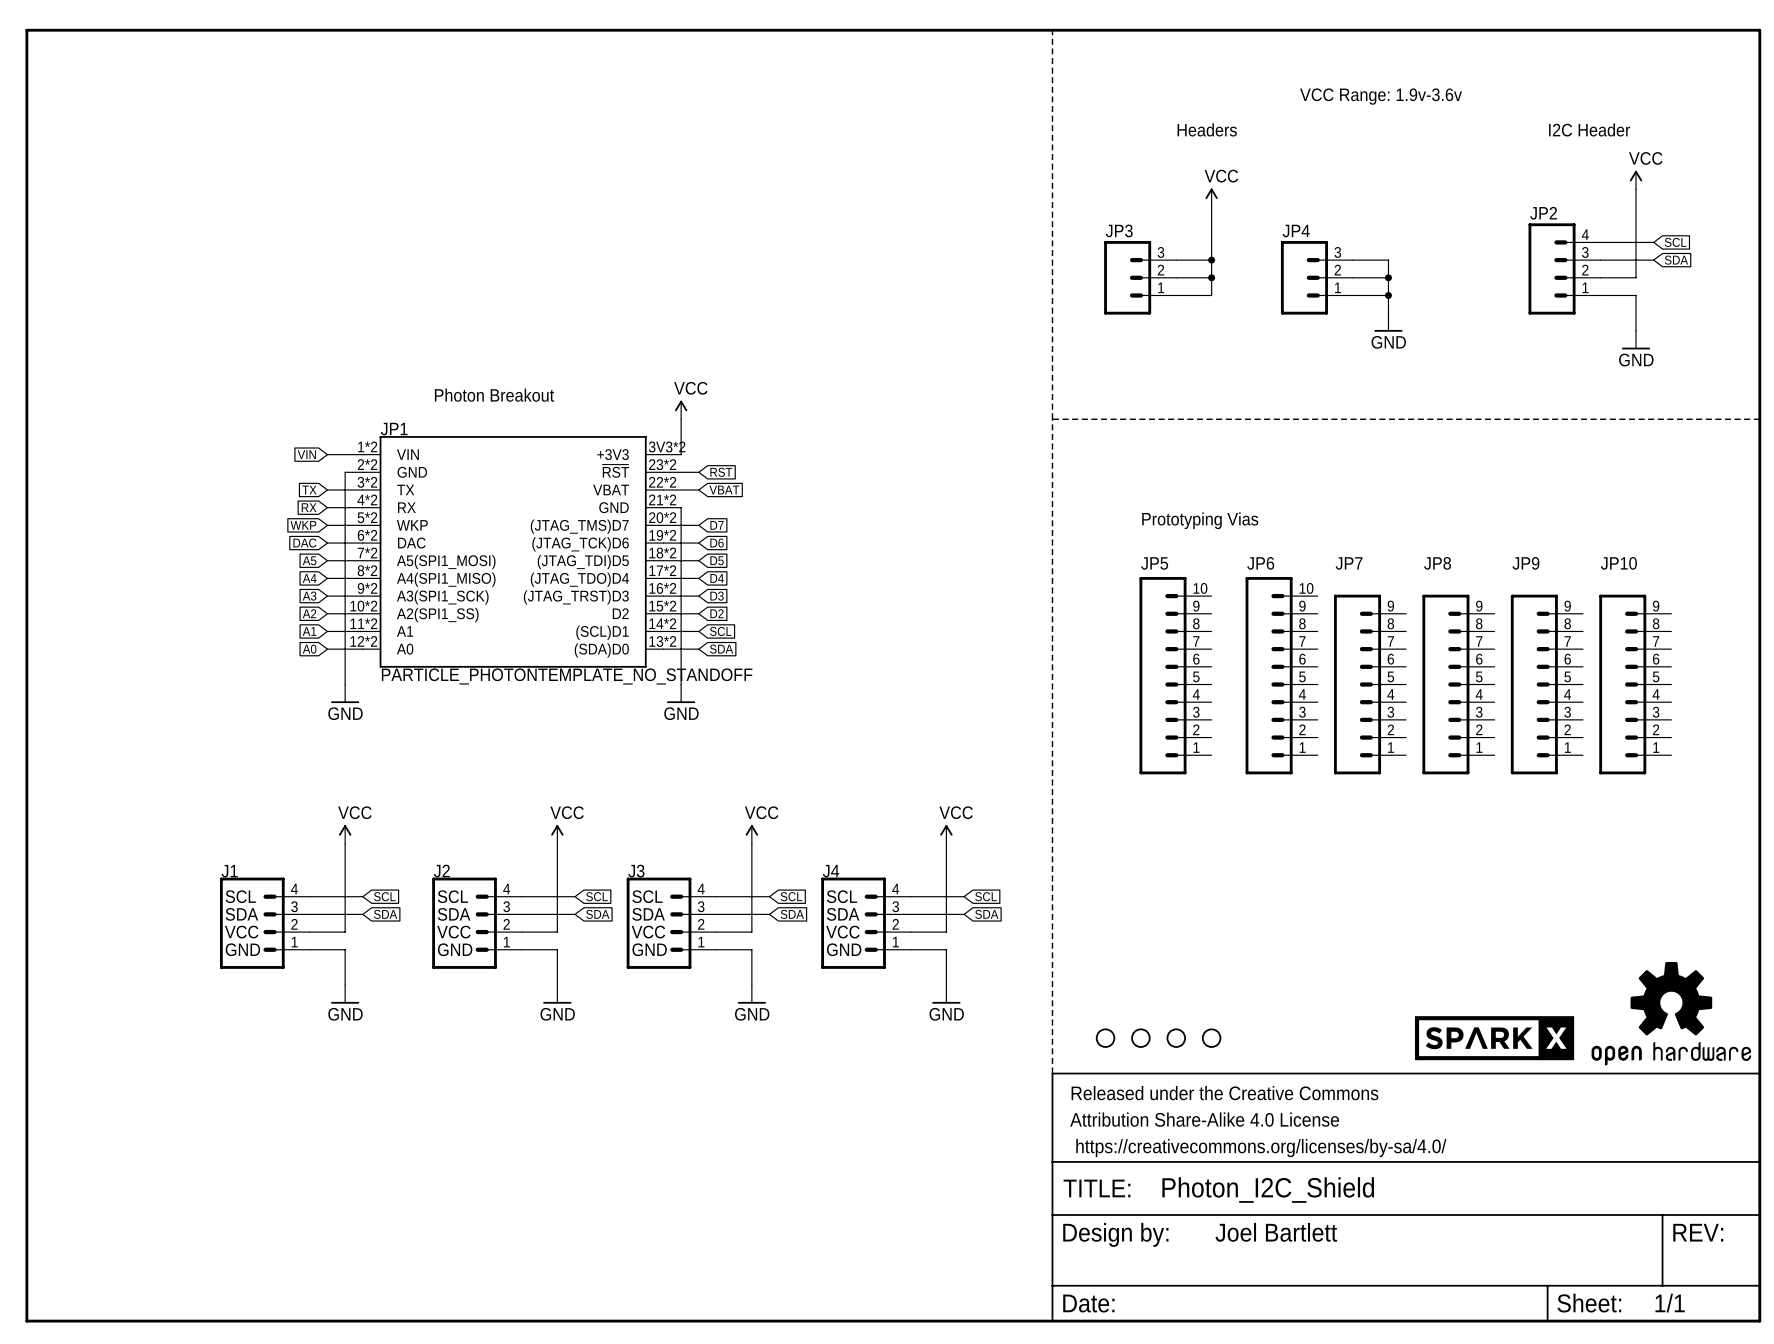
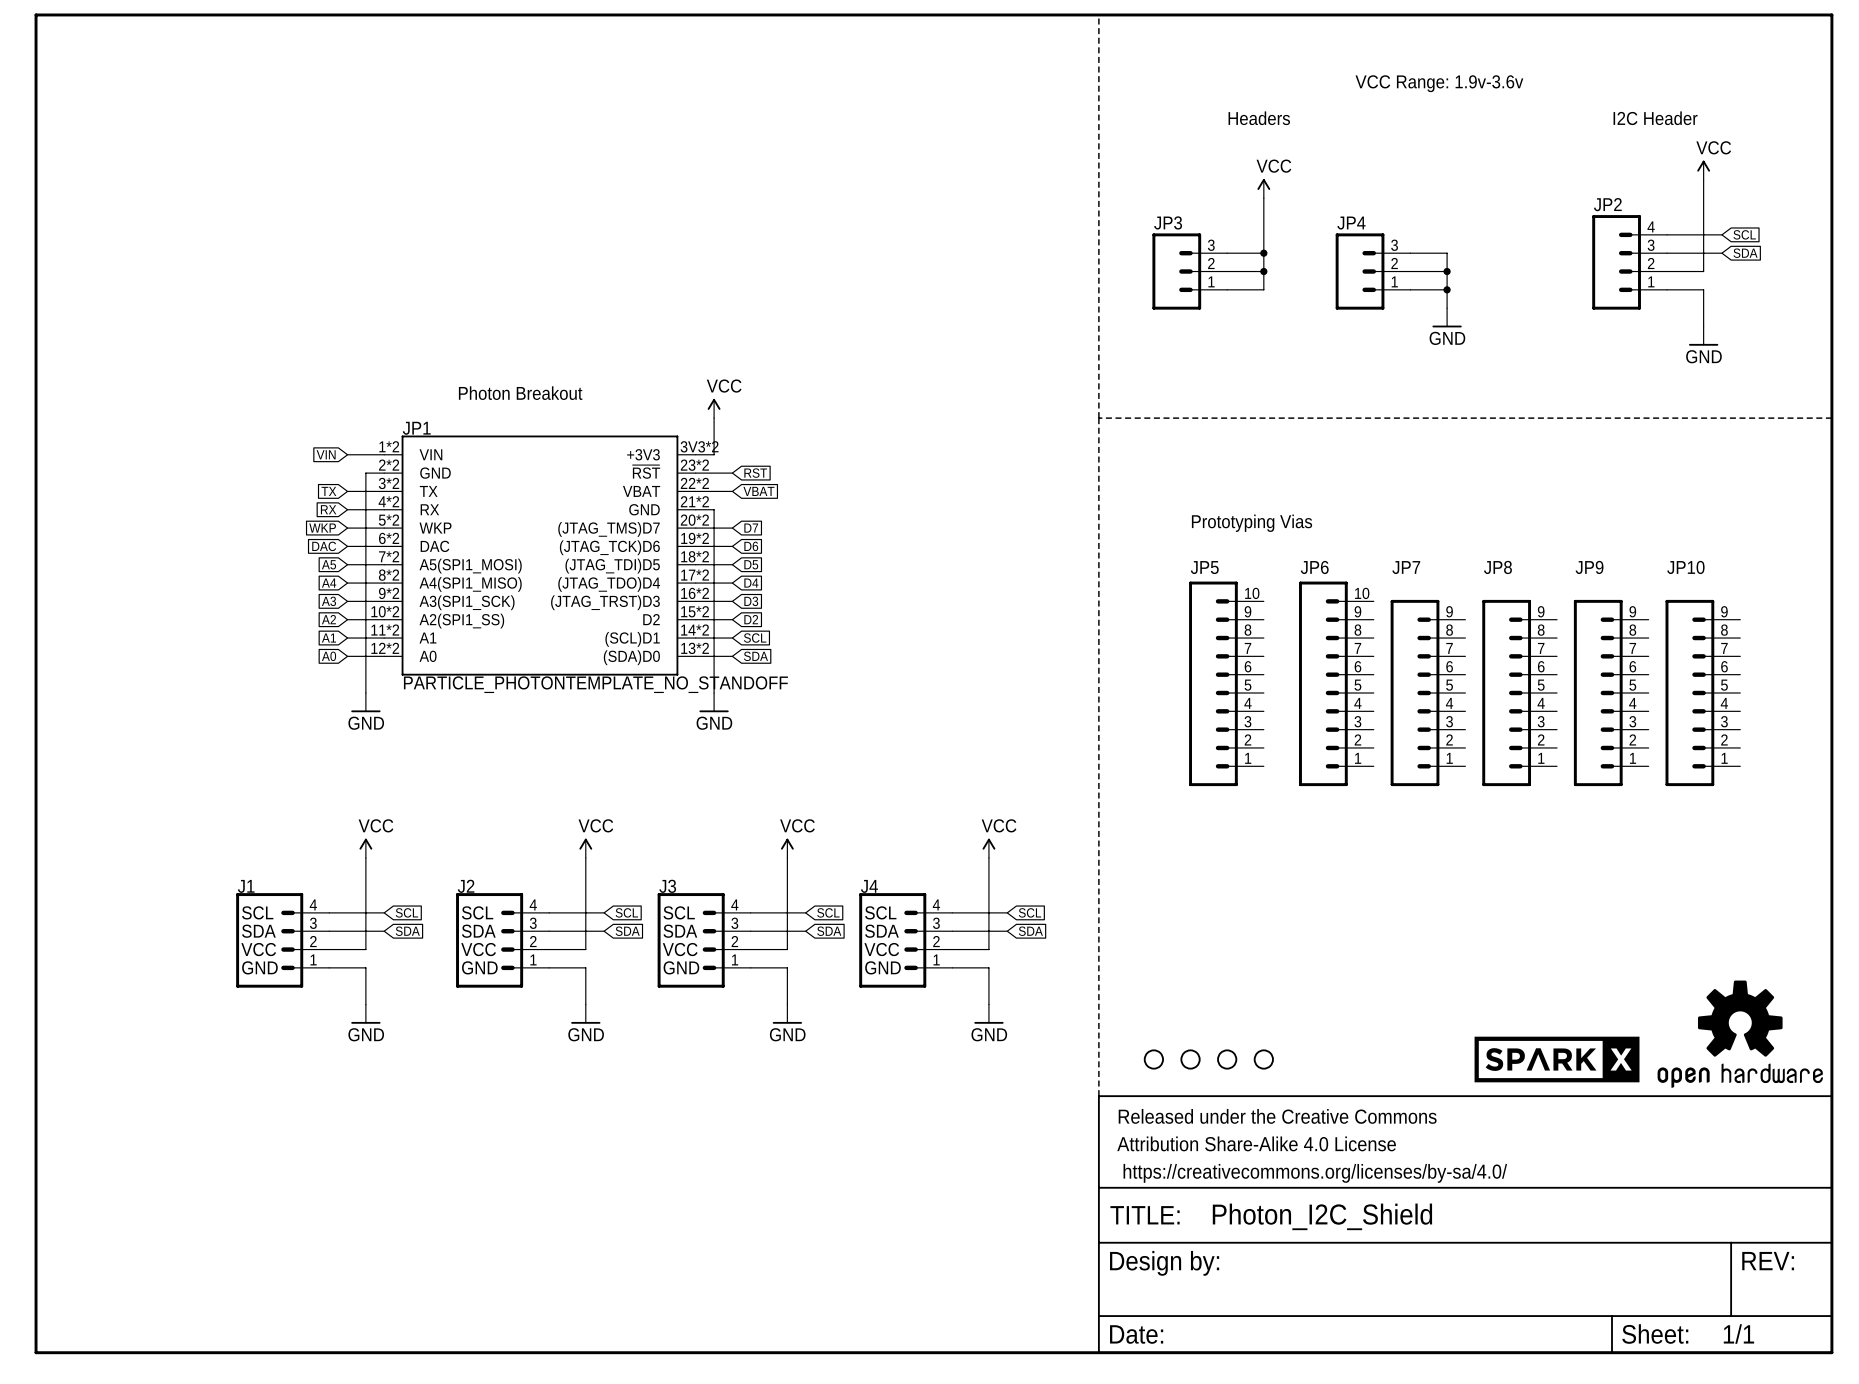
text: Joel Bartlett (1276, 1232) -> none

